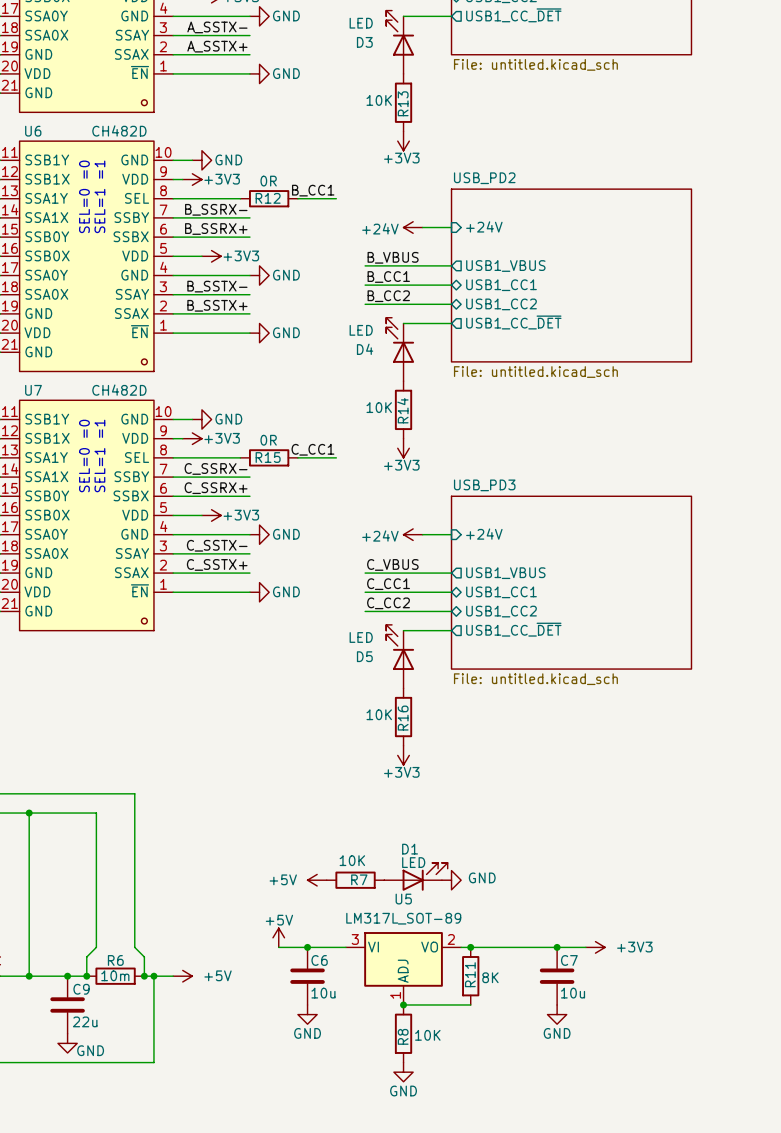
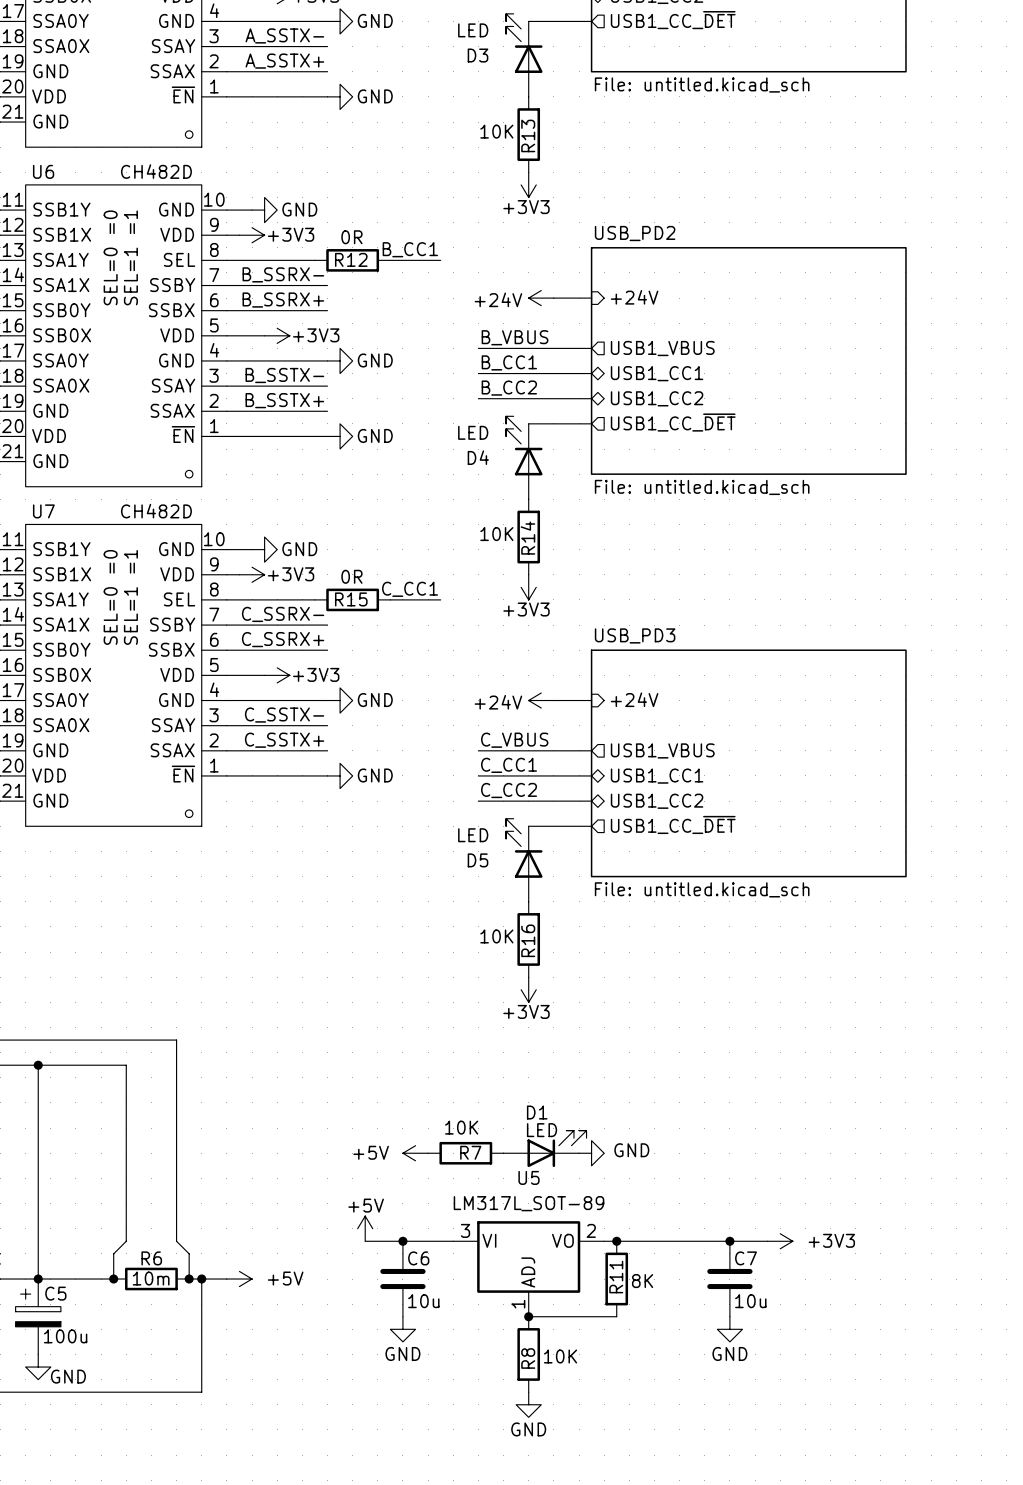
junction: (67, 976) -> none
C5: none -> 100u (38, 1316)
C9: 22u (67, 1004) -> none
power symbol position: GND (67, 1043) -> GND (38, 1367)

